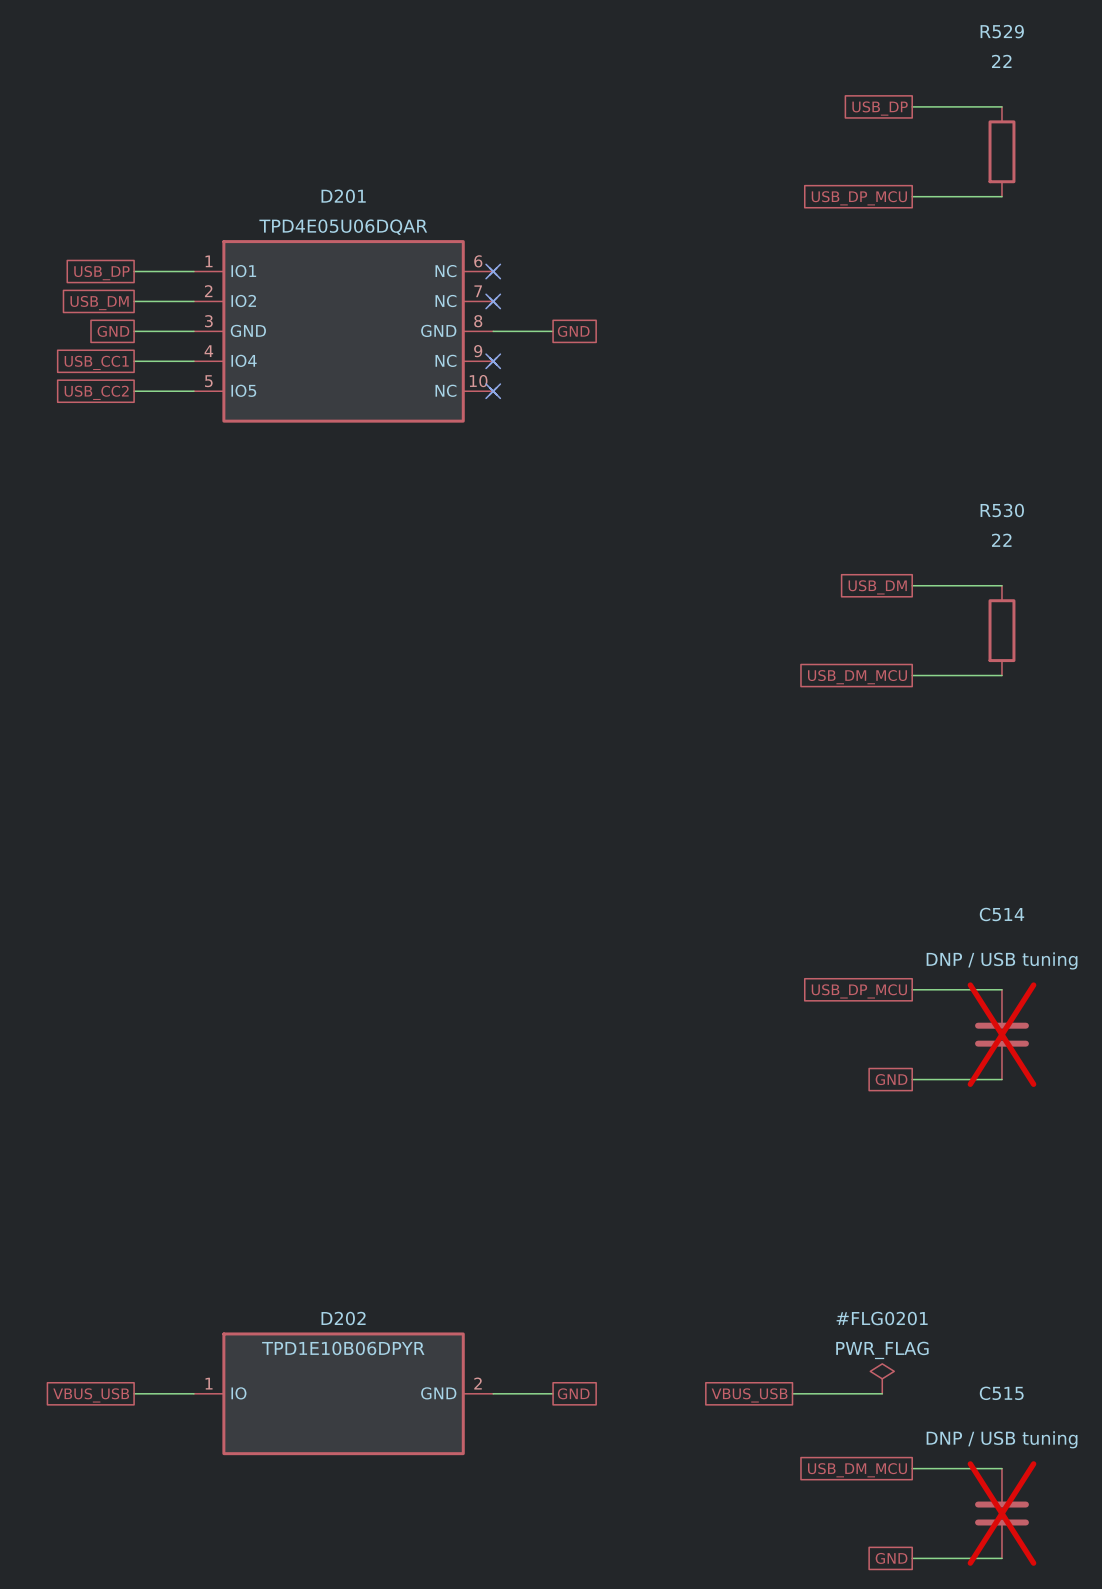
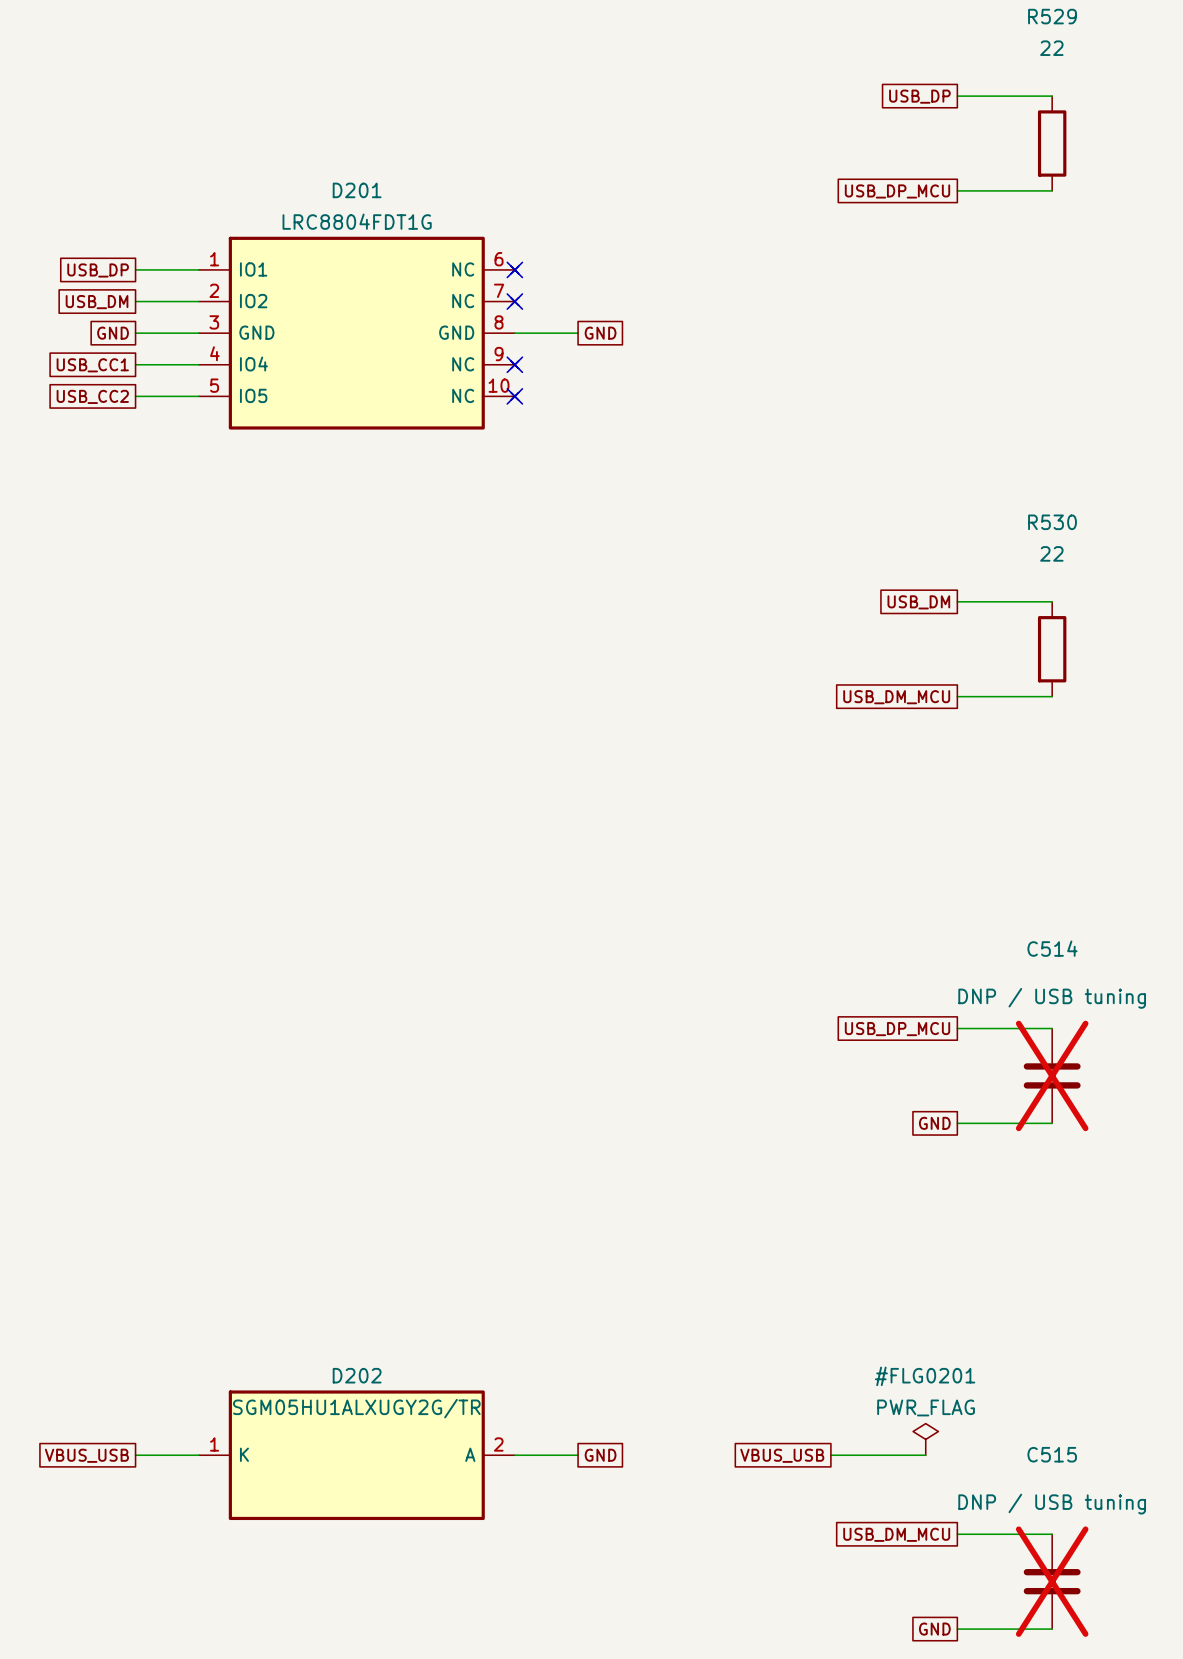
D201 value: TPD4E05U06DQAR (343, 227) -> LRC8804FDT1G (357, 221)
D202 value: TPD1E10B06DPYR (343, 1348) -> SGM05HU1ALXUGY2G/TR (356, 1408)
D202 pin name: IO (238, 1393) -> K (244, 1454)
D202 pin name: GND (438, 1393) -> A (470, 1454)

